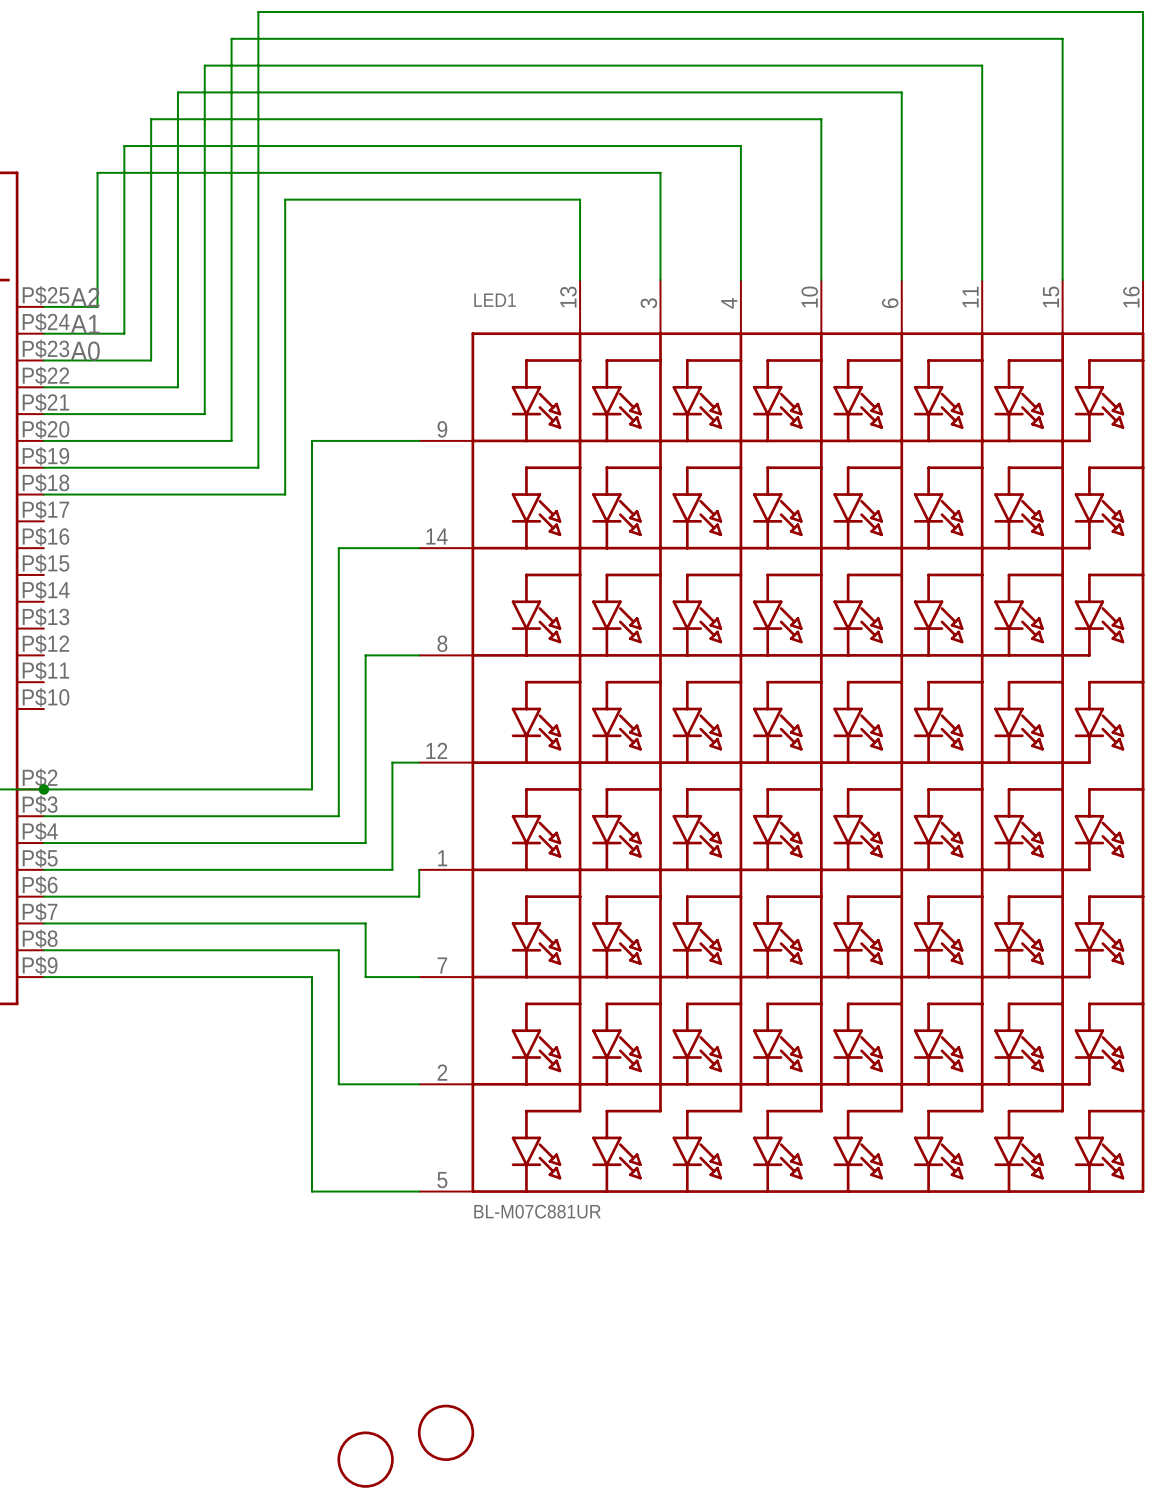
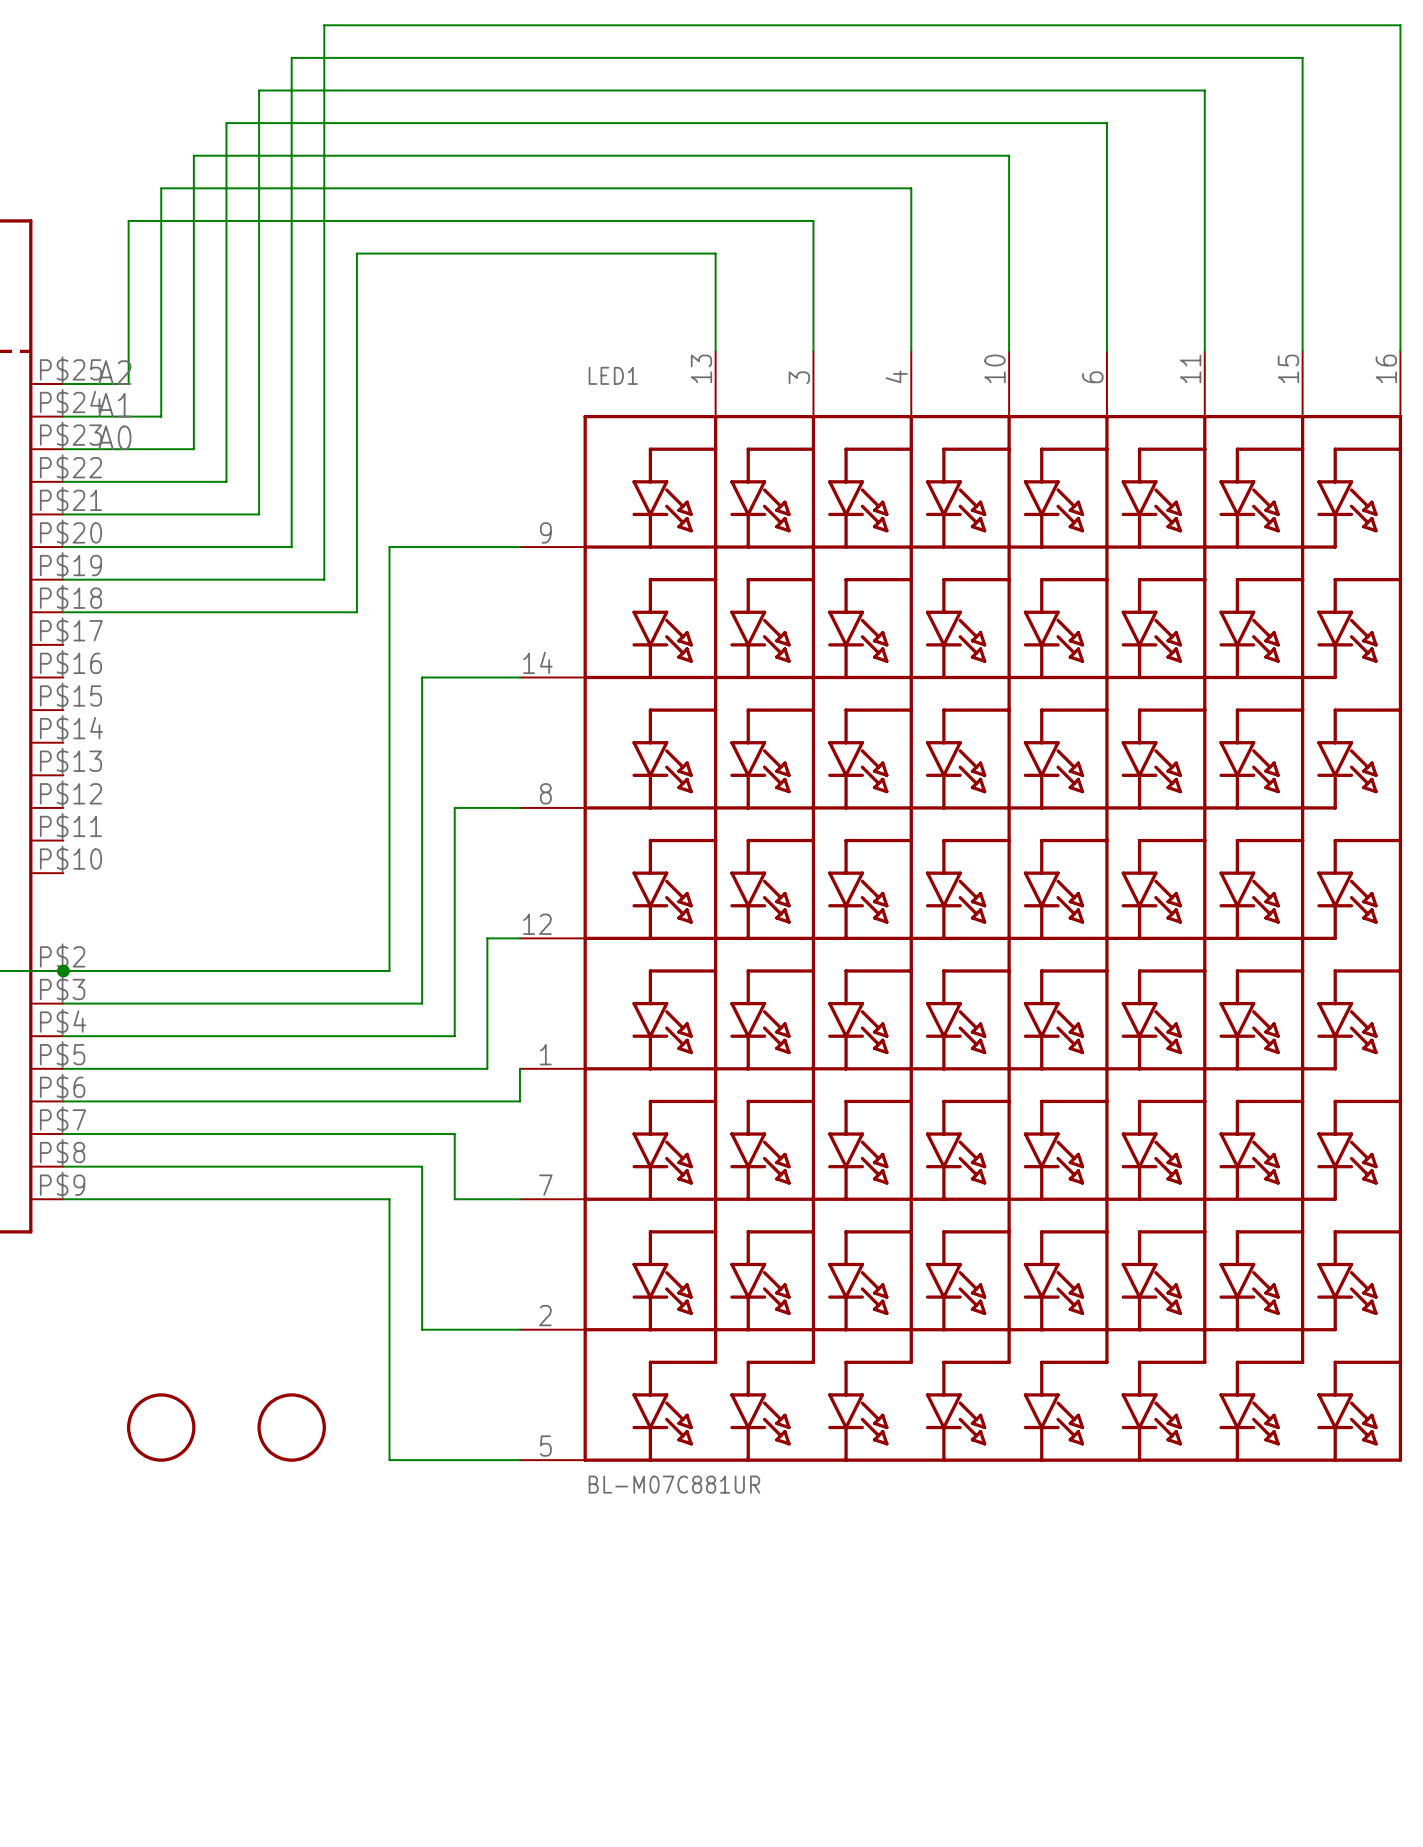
part: none -> (161, 1427)
part: none -> (291, 1427)
part: (446, 1432) -> none
part: (365, 1459) -> none

